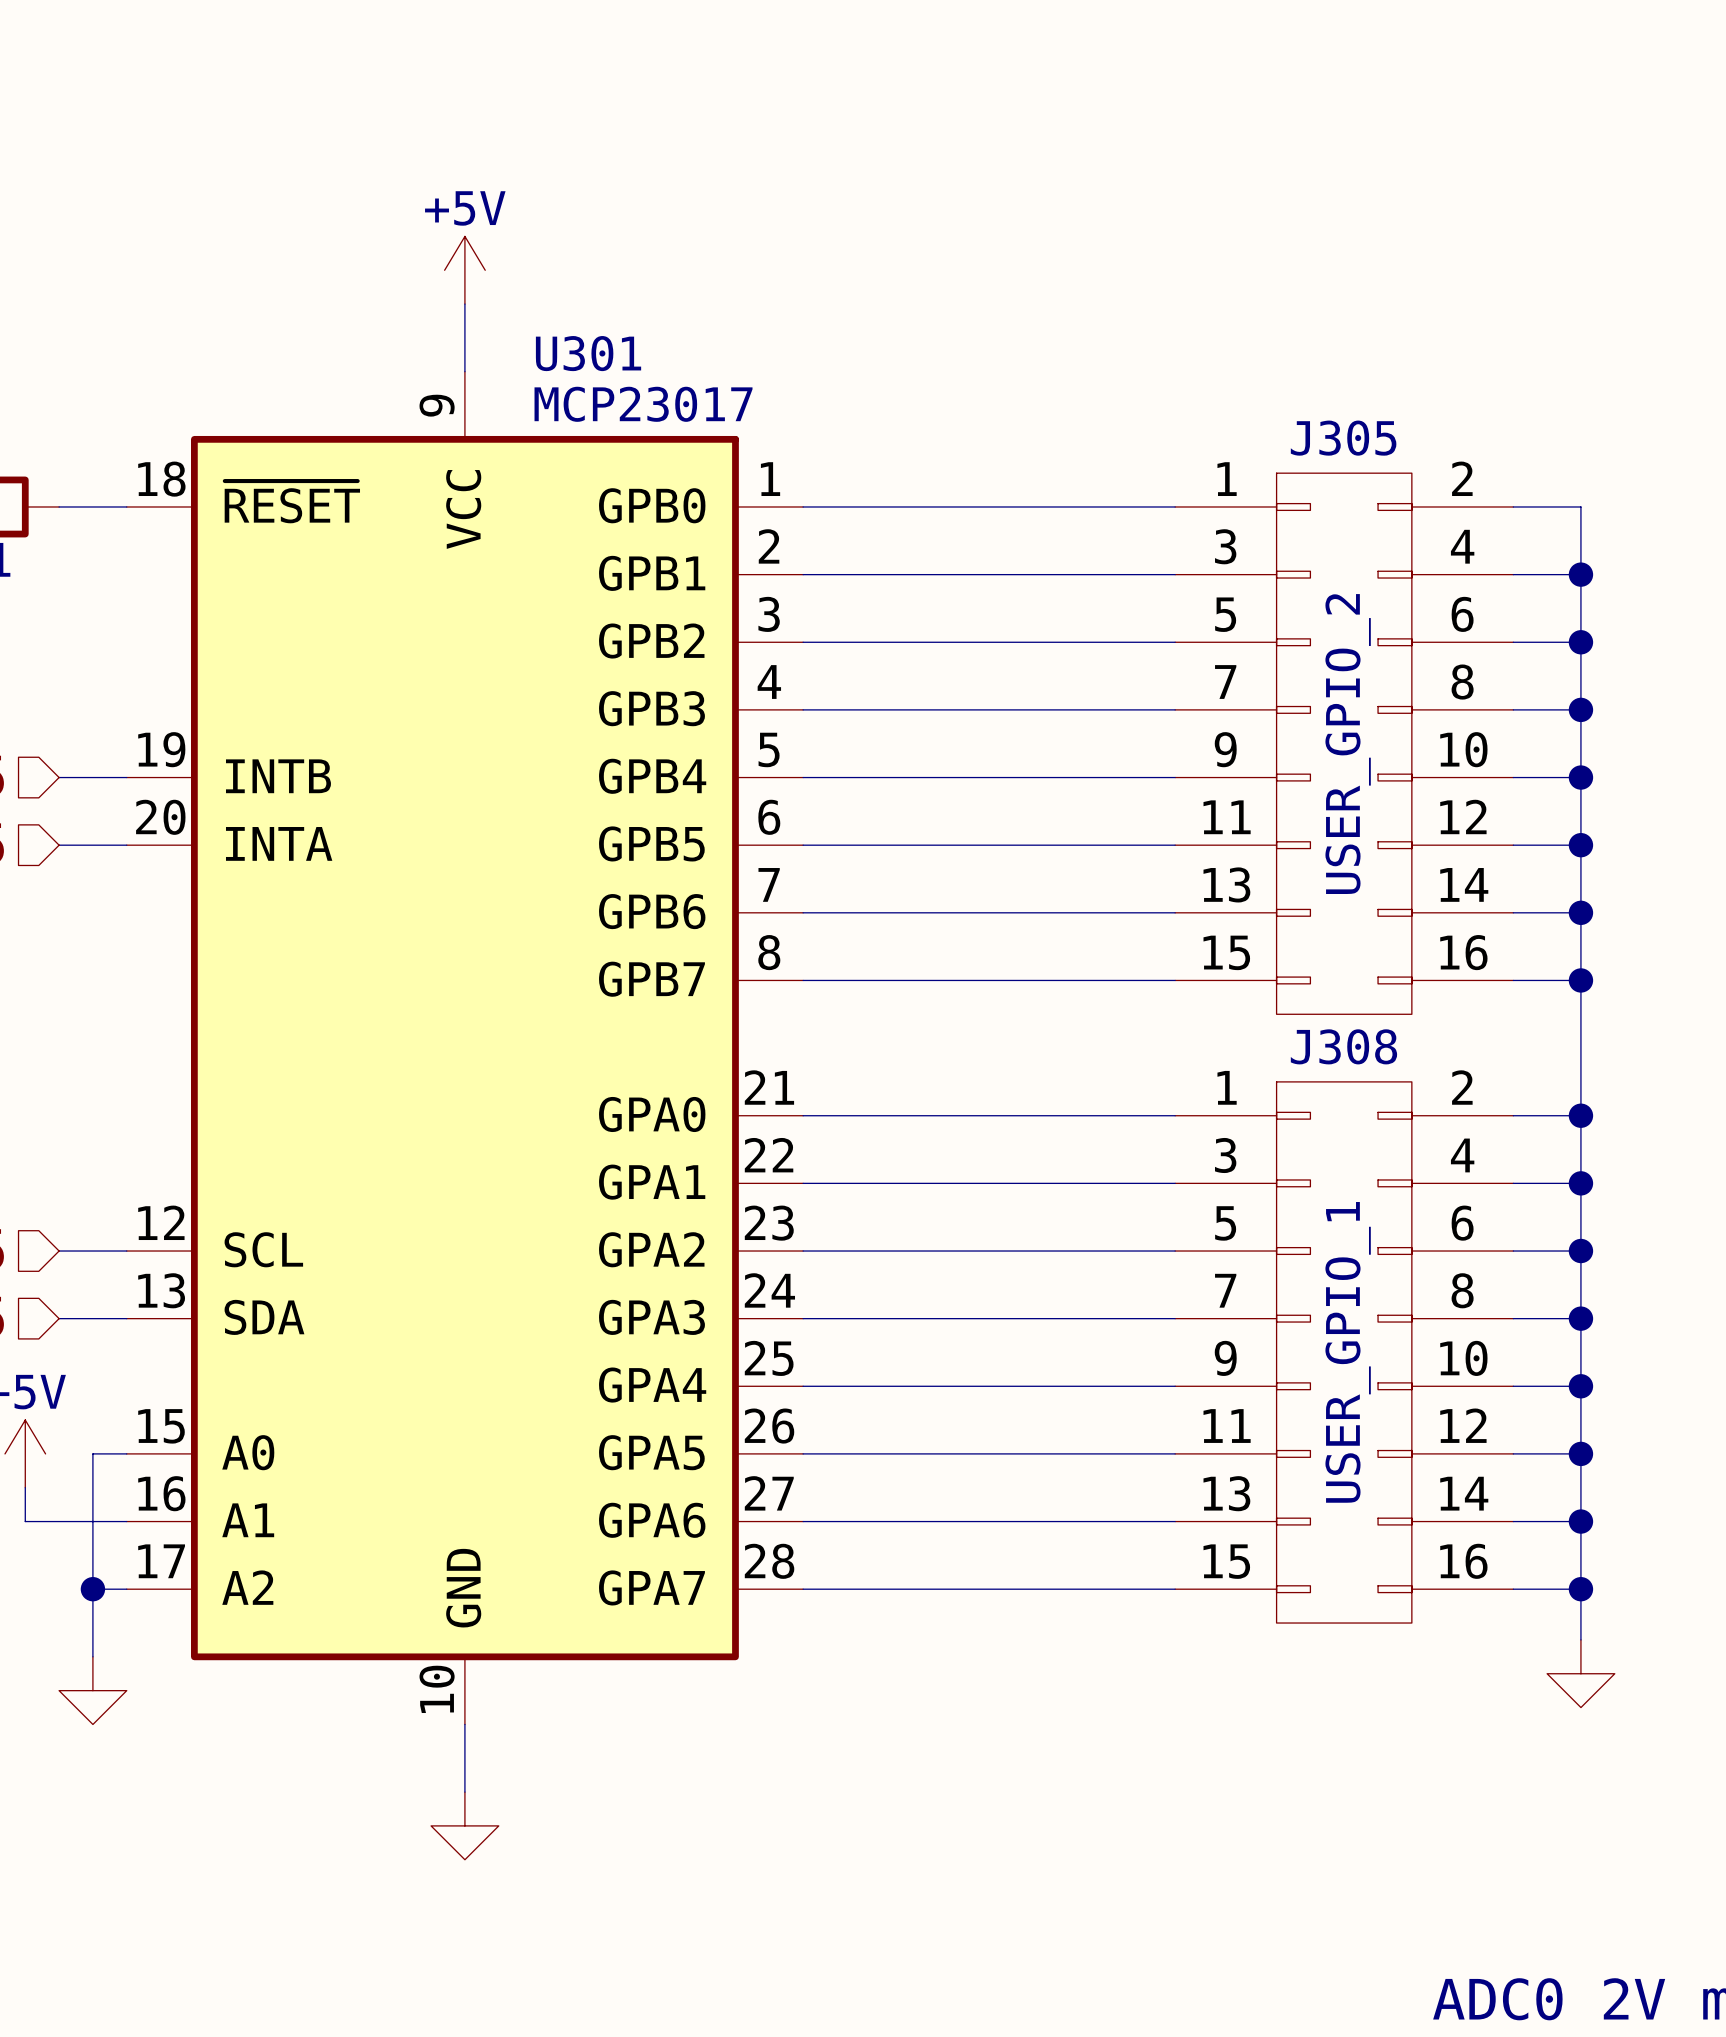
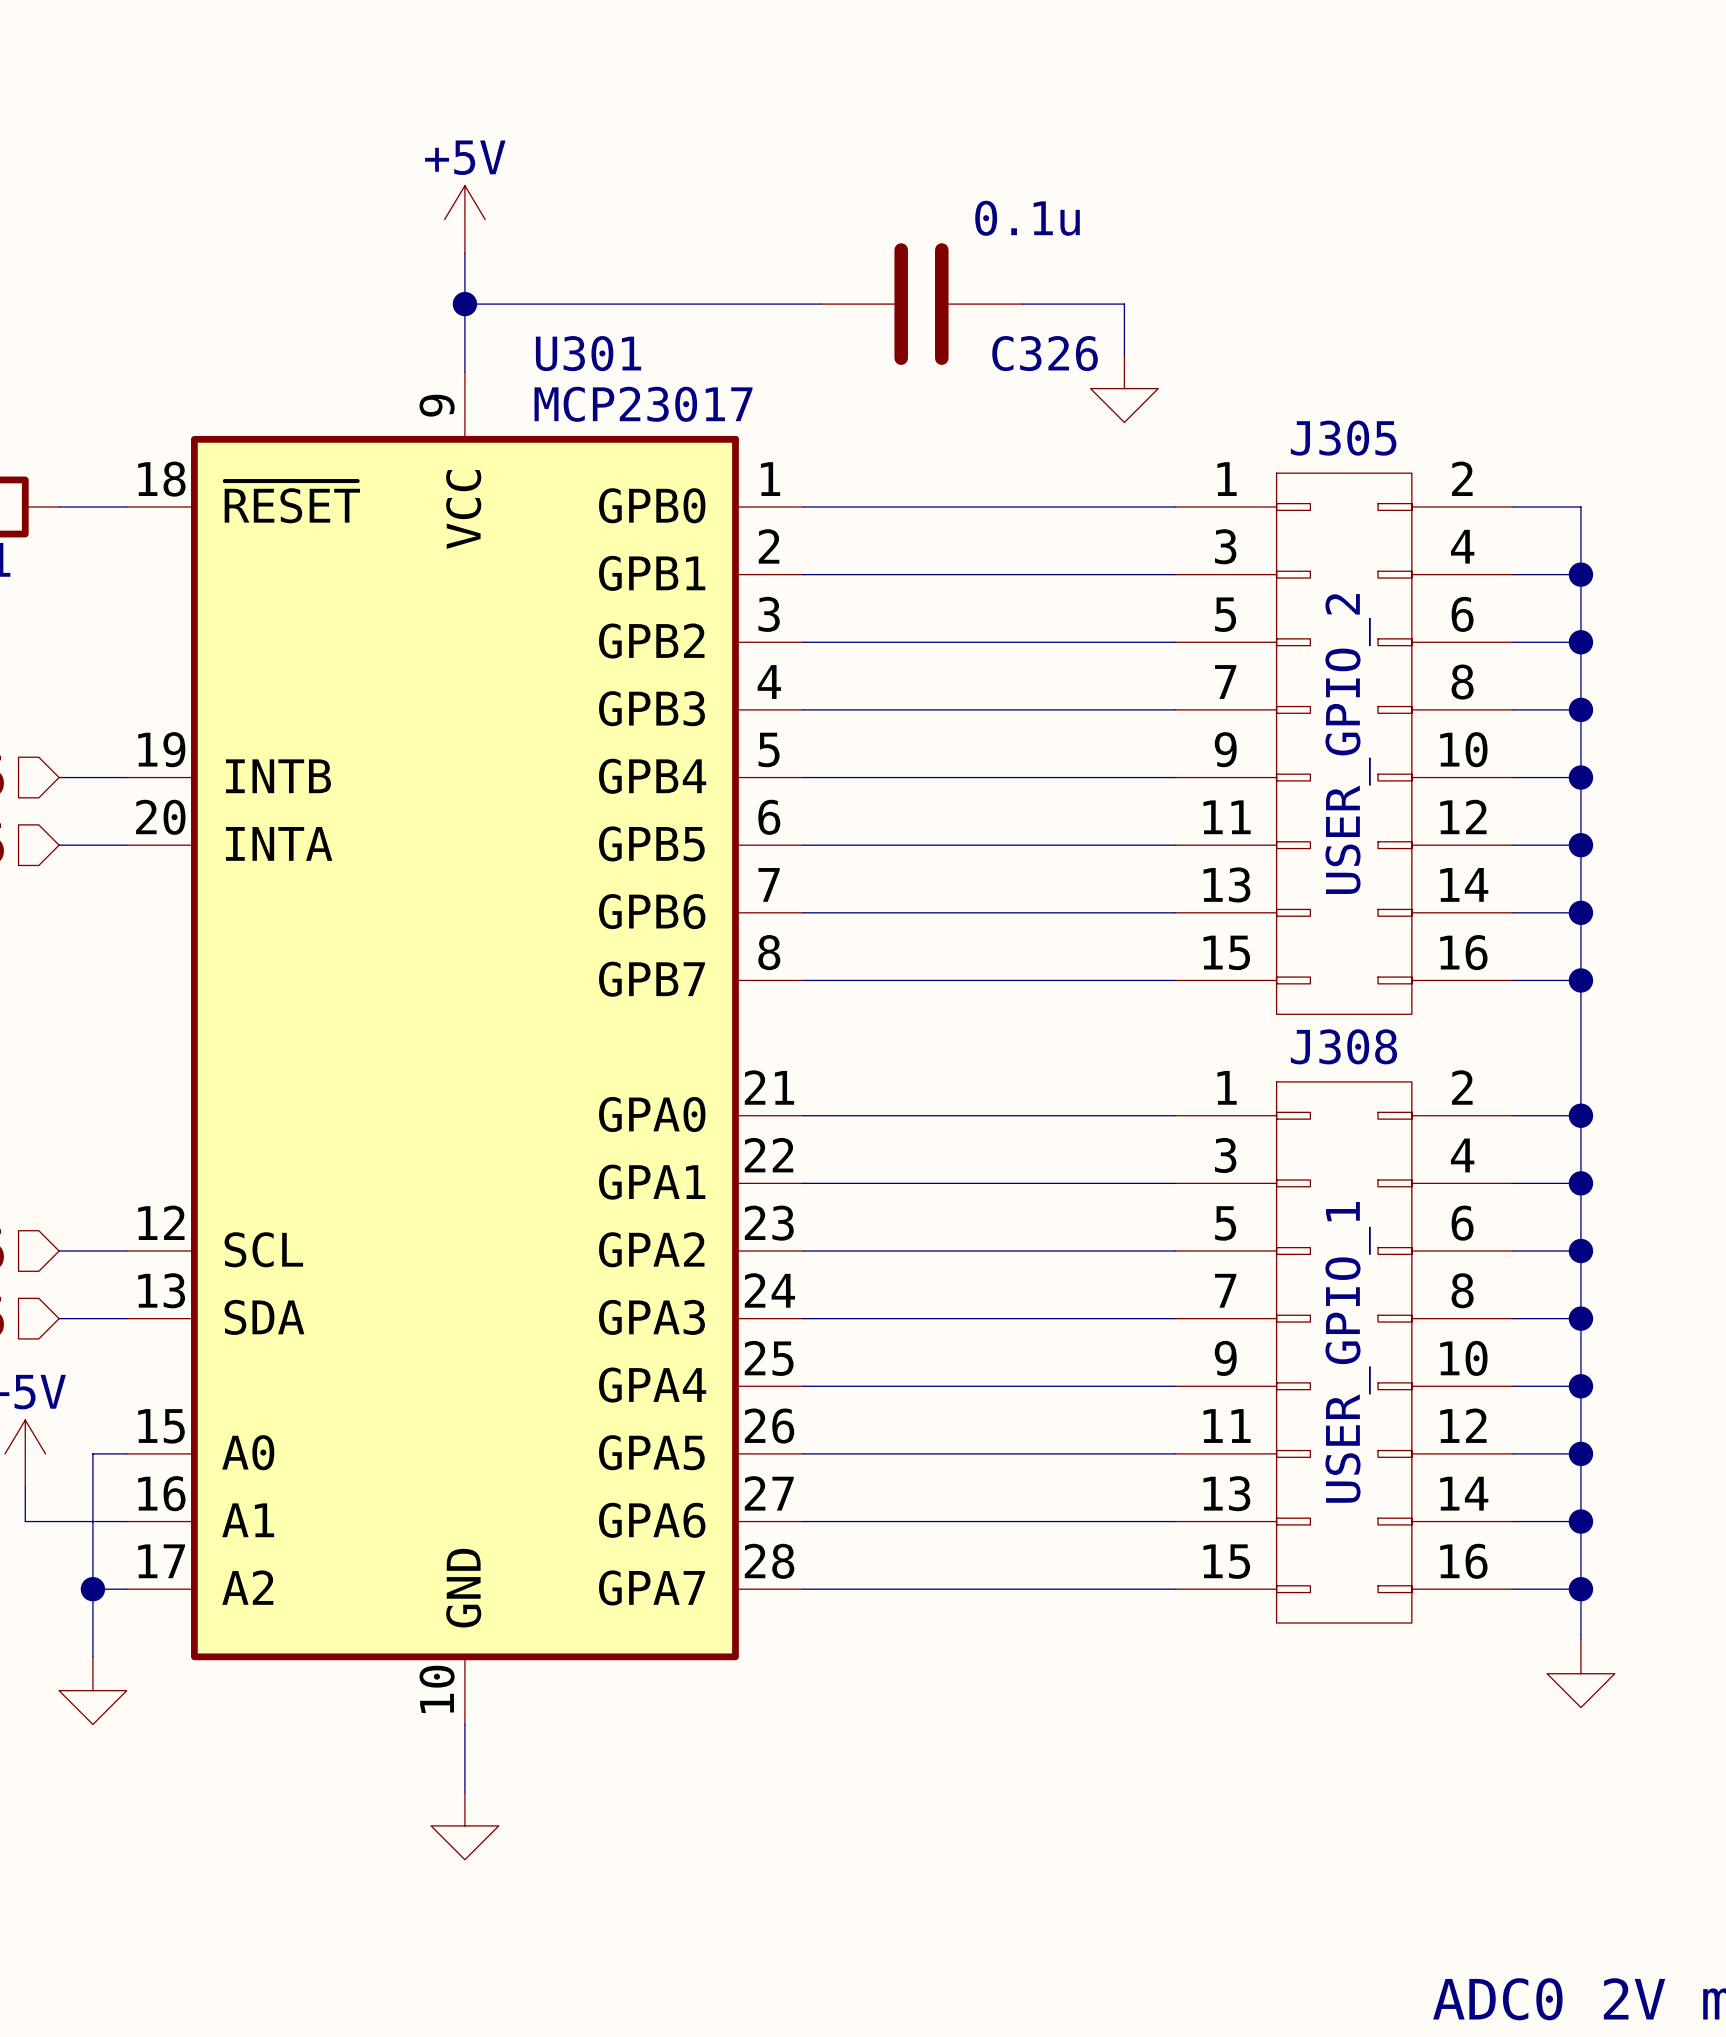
wire: none -> (464, 253) (464, 304) (820, 304)
power symbol position: +5V (464, 270) -> +5V (464, 219)
junction: none -> (464, 304)
C326: none -> 0.1u (921, 304)
wire: none -> (1022, 304) (1124, 304) (1124, 354)
power symbol: none -> (1124, 388)

